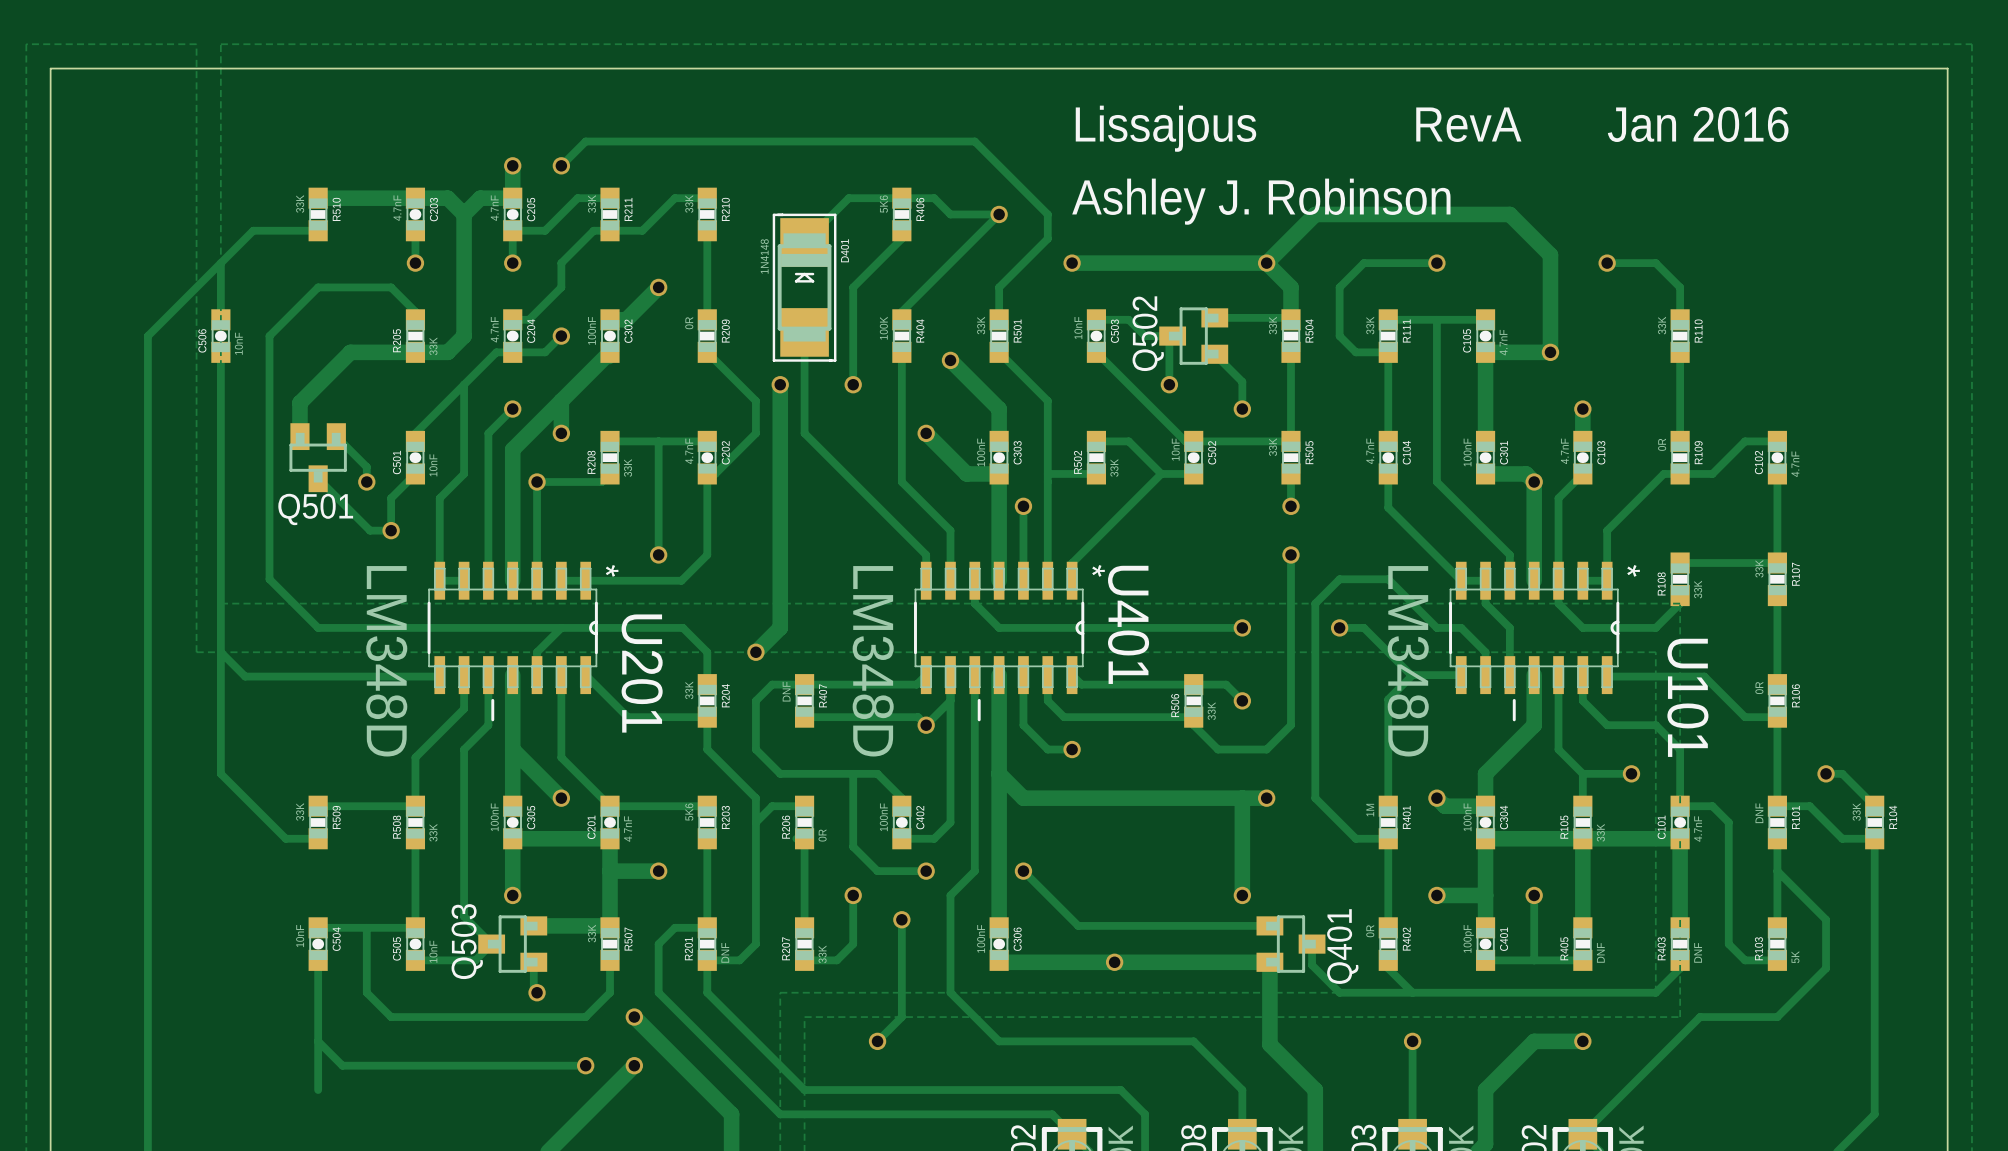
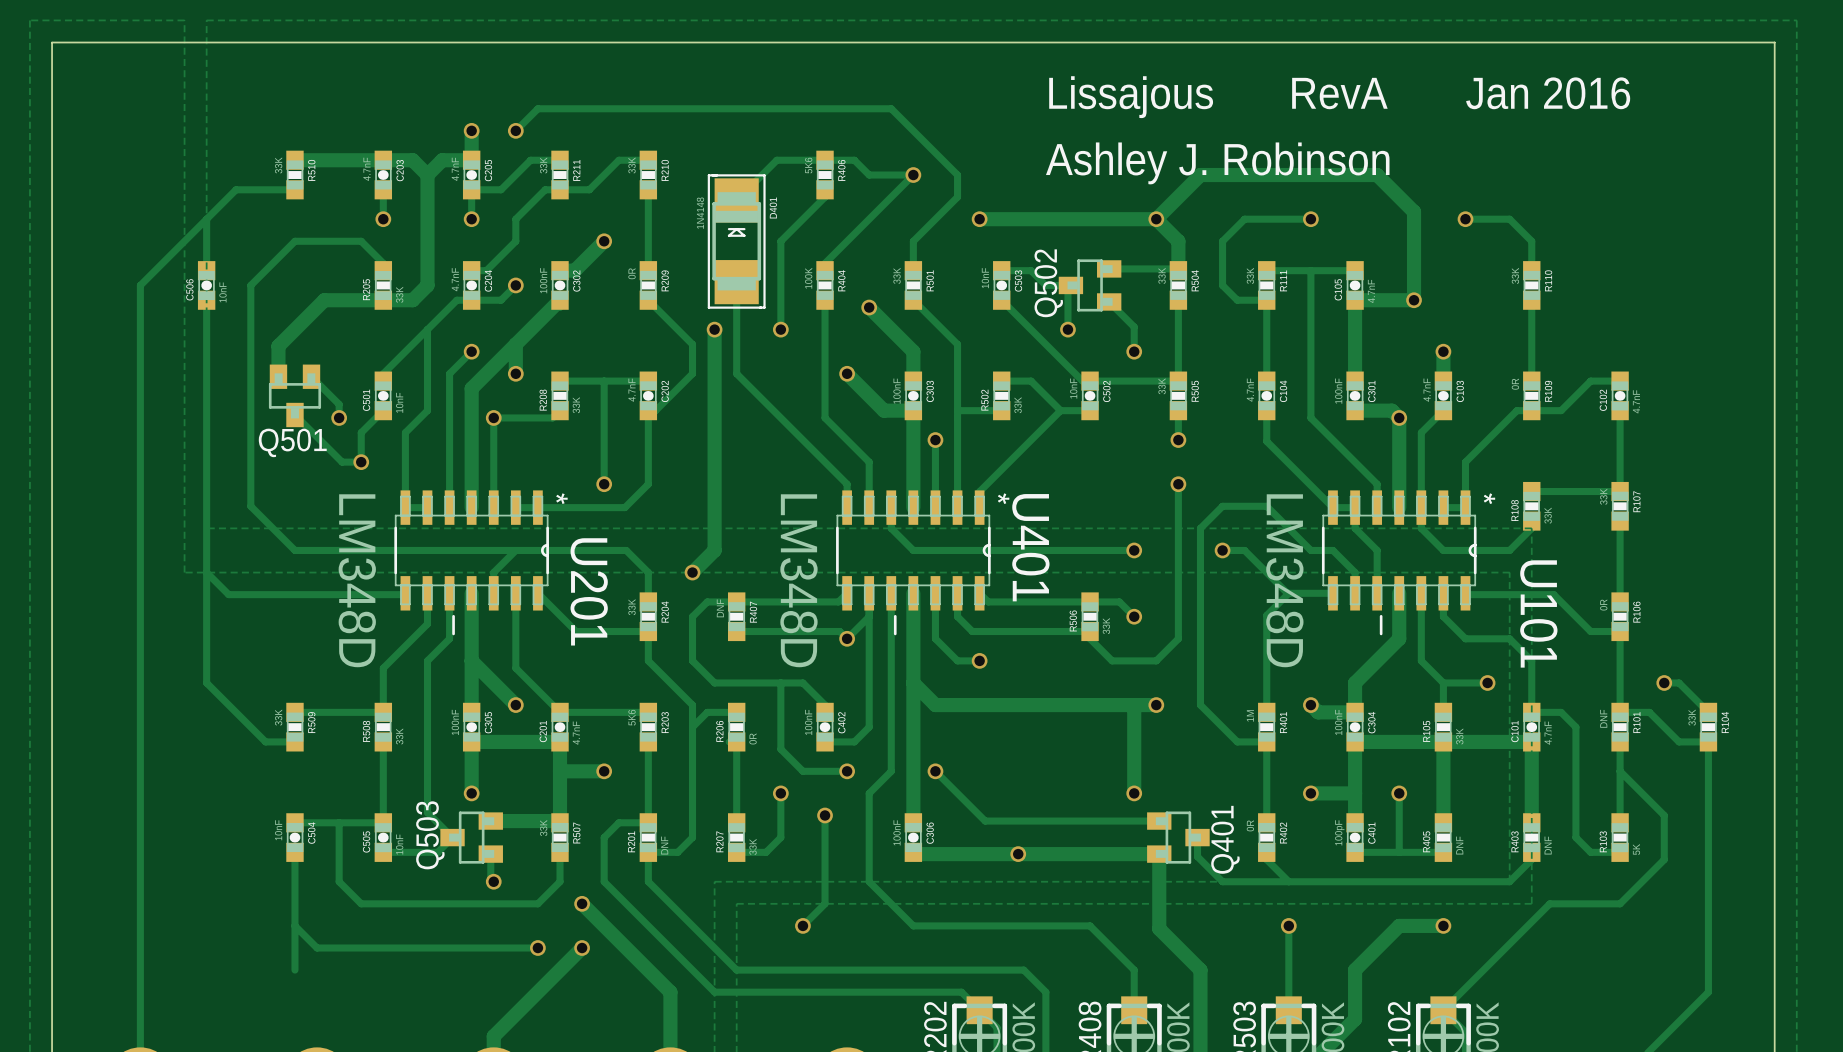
text position: Lissajous (1165, 128) -> Lissajous (1131, 97)
text position: Ashley J. Robinson (1261, 201) -> Ashley J. Robinson (1217, 163)

